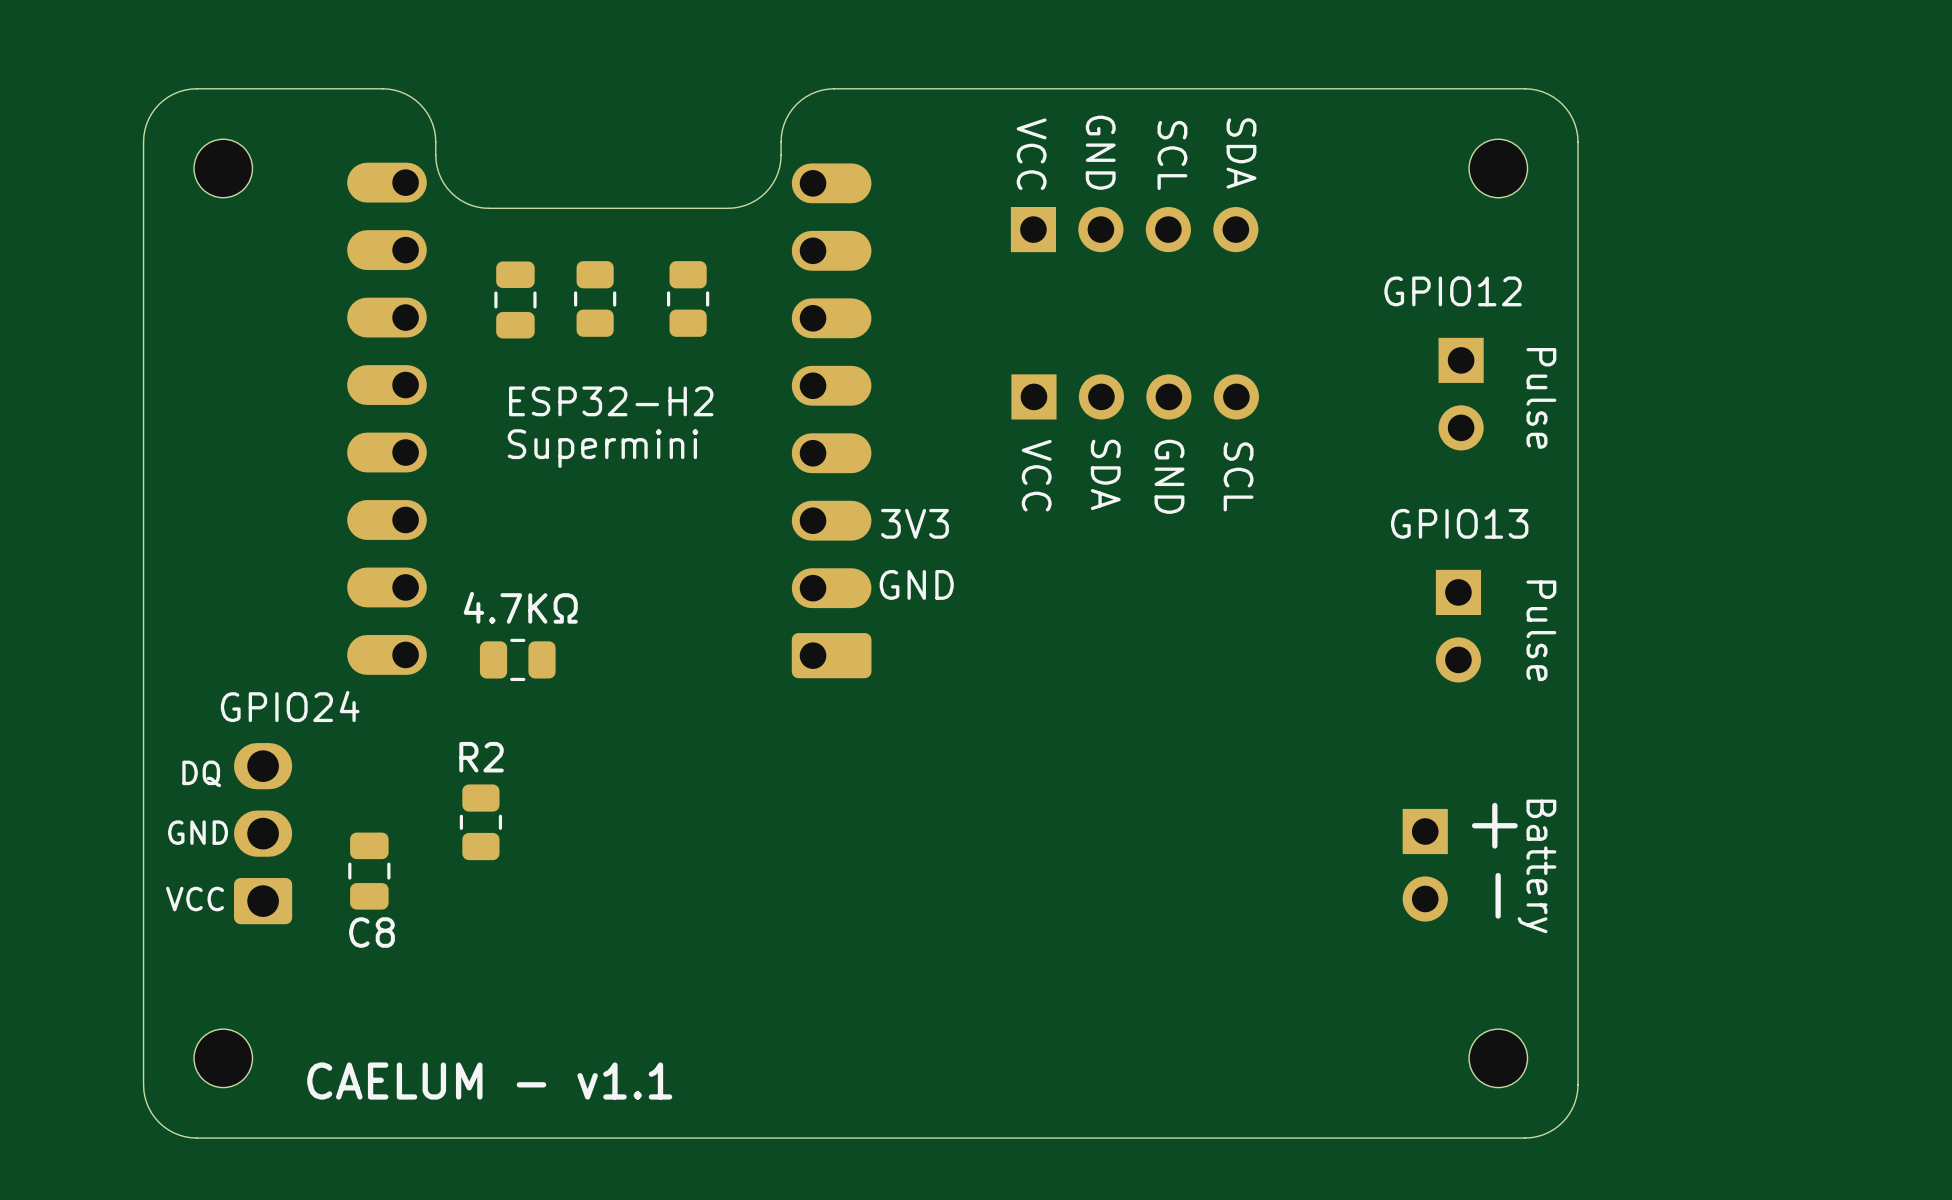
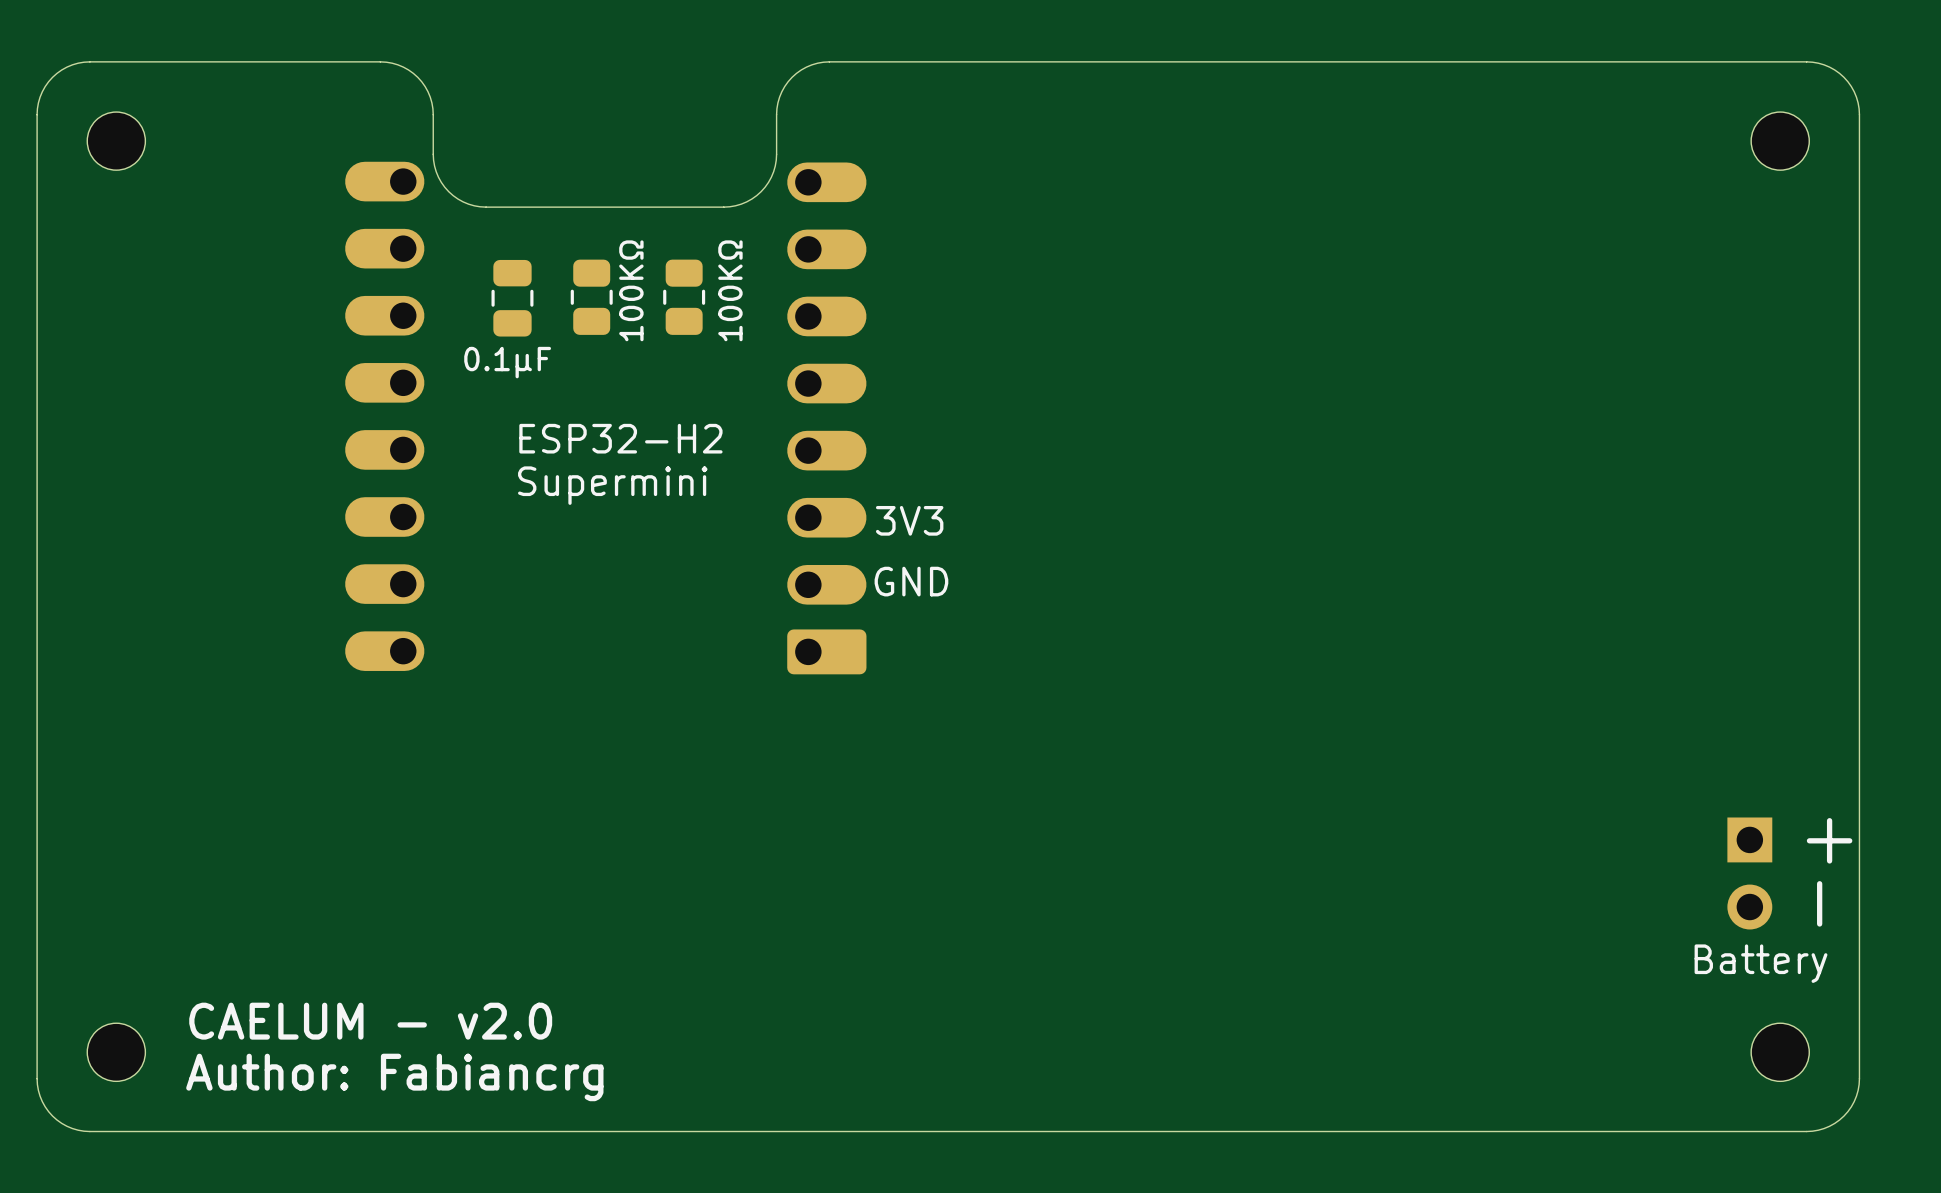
board edge: (435, 141) (432, 124) (420, 104) (405, 94) (382, 88) (184, 90) (173, 94) (159, 104) (151, 113) (144, 130) (143, 1084) (148, 1107) (159, 1122) (173, 1132) (196, 1138) -> (433, 141) (432, 108) (425, 86) (408, 69) (386, 62) (83, 62) (66, 67) (56, 73) (45, 86) (38, 102) (37, 1084) (42, 1101) (48, 1111) (61, 1123) (72, 1128) (89, 1131) (195, 1131)
board edge: (781, 141) (784, 124) (796, 104) (811, 94) (834, 88) (1524, 88) (1547, 94) (1566, 108) (1575, 124) (1577, 141) (1577, 1084) (1572, 1107) (1562, 1122) (1547, 1132) (1524, 1138) -> (776, 141) (776, 108) (784, 86) (792, 77) (806, 67) (829, 61) (1806, 61) (1829, 67) (1847, 81) (1856, 97) (1859, 114) (1859, 1078) (1856, 1096) (1847, 1111) (1839, 1119) (1824, 1128) (1812, 1131) (1516, 1131)
text: GND (1100, 152) -> none
text: SDA (1241, 153) -> none
text: VCC (1031, 154) -> none
text: SCL (1172, 155) -> none
part position: (223, 168) -> (116, 141)
part position: (1498, 168) -> (1780, 141)
part: (1134, 229) -> none
text: GPIO12 (1453, 291) -> none
text: none -> 100KΩ (631, 290)
text: none -> 100KΩ (730, 290)
text: none -> 0.1µF (507, 362)
part: (1461, 394) -> none
part: (1135, 396) -> none
text: Pulse (1541, 398) -> none
text position: ESP32-H2 (611, 401) -> ESP32-H2 (620, 438)
text position: Supermini (603, 448) -> Supermini (612, 485)
text: SDA (1105, 474) -> none
text: VCC (1036, 475) -> none
text: GND (1169, 476) -> none
text: SCL (1238, 476) -> none
text: GPIO13 (1459, 523) -> none
text: 4.7KΩ (520, 607) -> none
part: (1458, 626) -> none
text: Pulse (1541, 630) -> none
part: (517, 659) -> none
text: GPIO24 (290, 706) -> none
text: DQ (201, 773) -> none
R2: (480, 822) -> none
text position: + (1494, 825) -> + (1829, 840)
text: GND (198, 832) -> none
part: (263, 833) -> none
part: (1425, 865) -> none
text rotation: 0° (1536, 866) -> 90° counterclockwise (1761, 963)
text position: Battery (1536, 866) -> Battery (1761, 963)
C8: (369, 871) -> none
part: none -> (1749, 873)
text position: - (1498, 895) -> - (1819, 903)
text: VCC (195, 899) -> none
part position: (223, 1058) -> (116, 1052)
part position: (1498, 1058) -> (1780, 1052)
text: CAELUM - v1.1 (489, 1081) -> CAELUM - v2.0 (370, 1021)
text: none -> Author: Fabiancrg (394, 1077)

